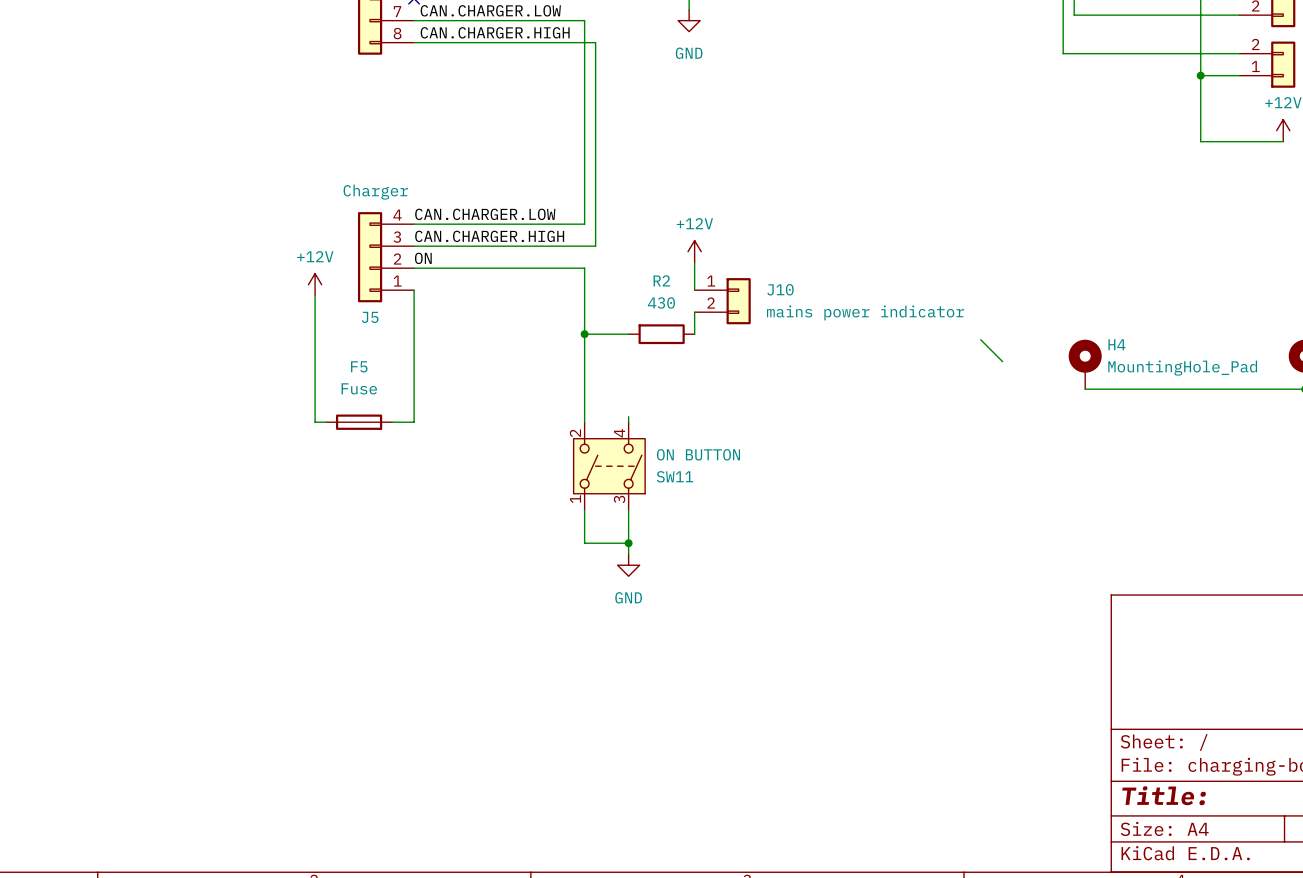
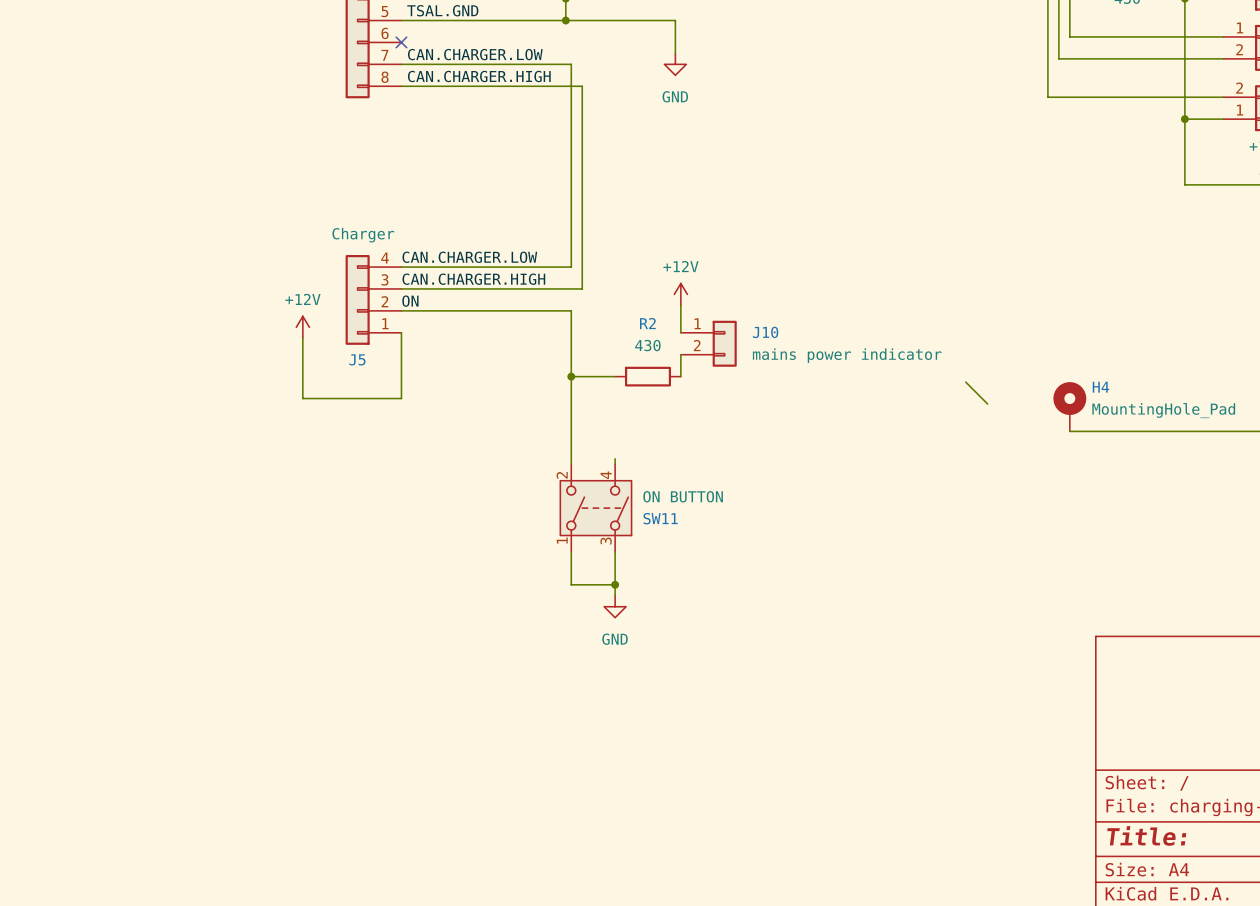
wire: (315, 356) (315, 422) (326, 422) -> none
wire: (414, 356) (414, 422) (392, 422) -> (401, 398) (302, 398)
F5: Fuse (359, 422) -> none

